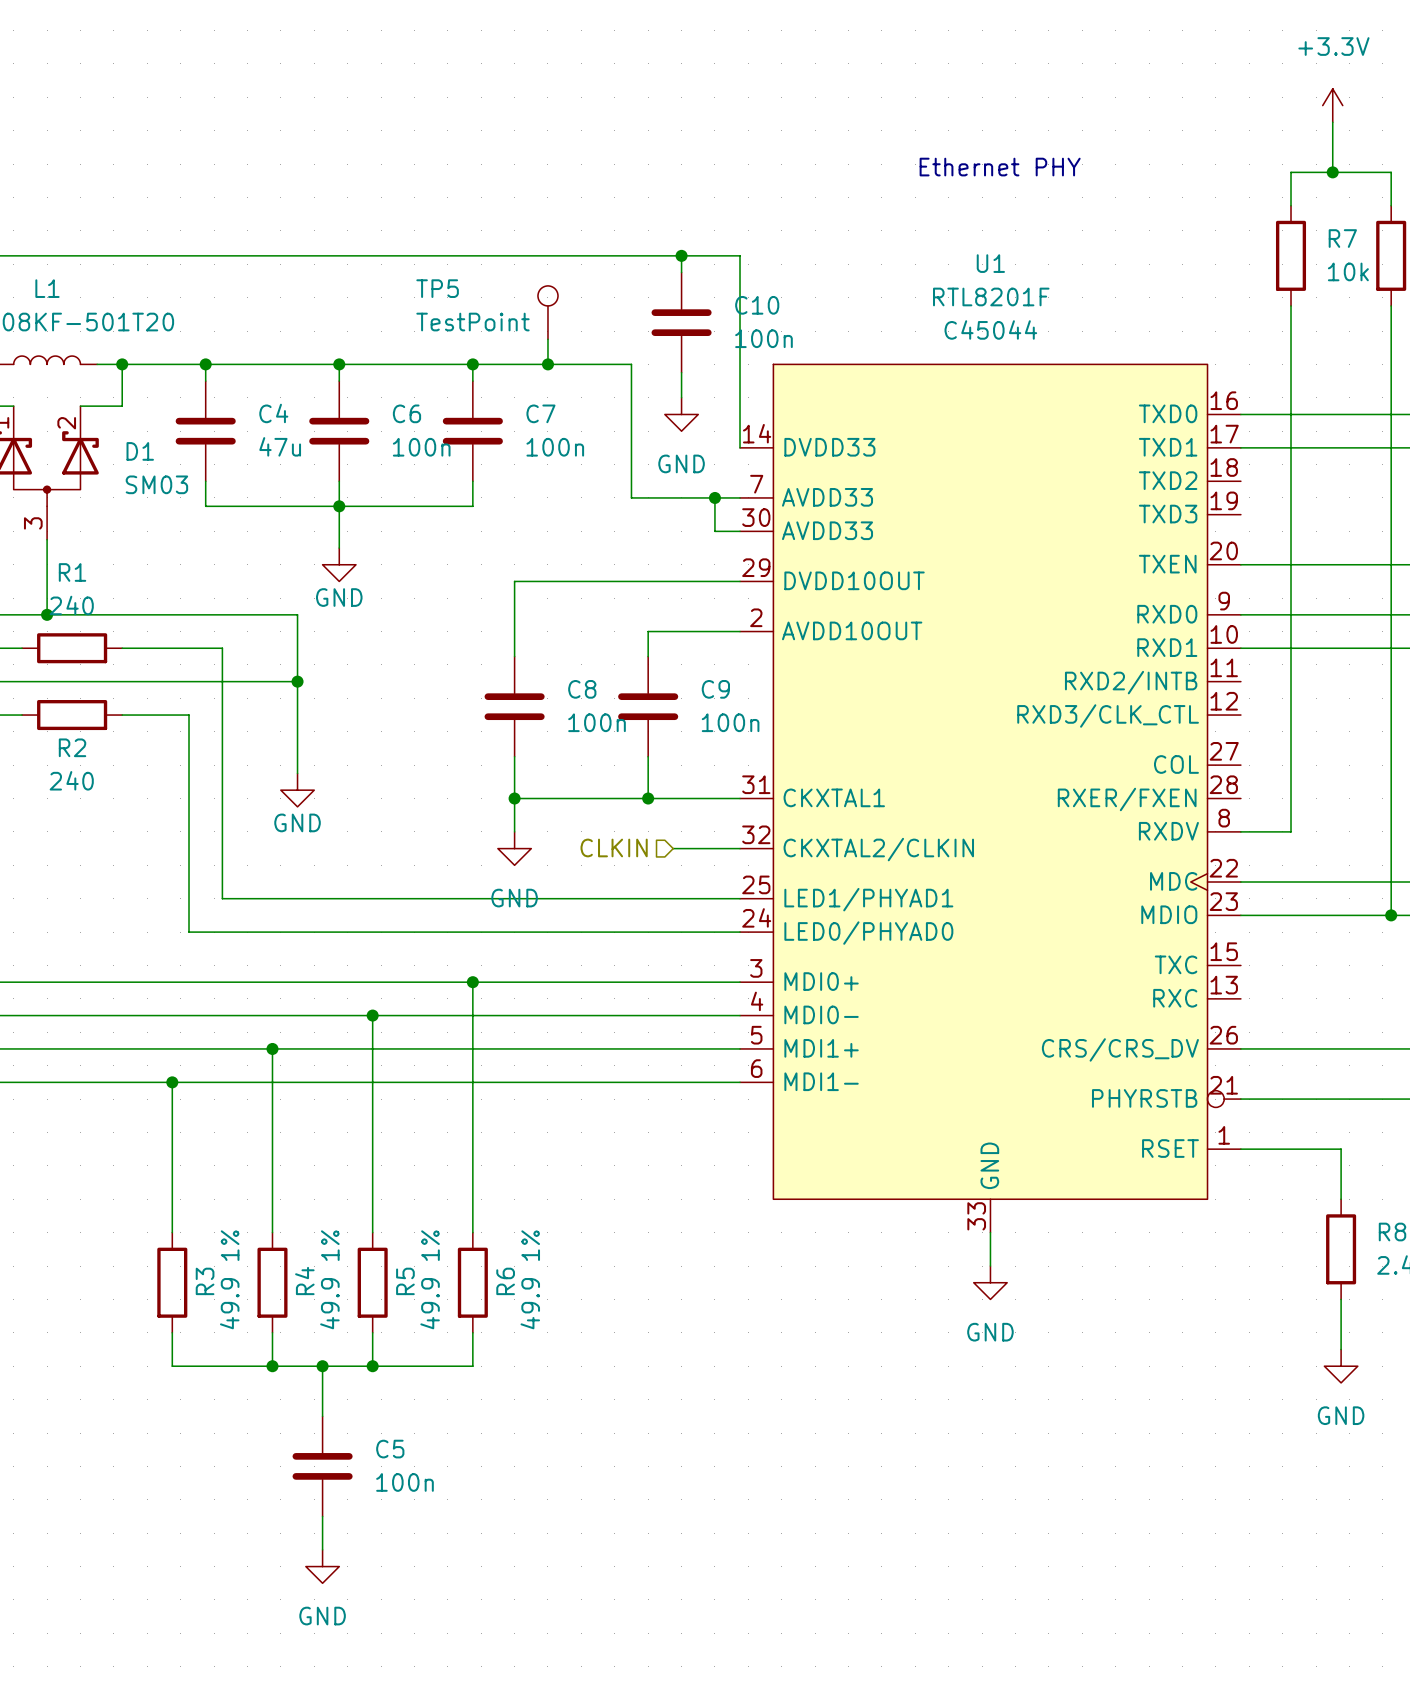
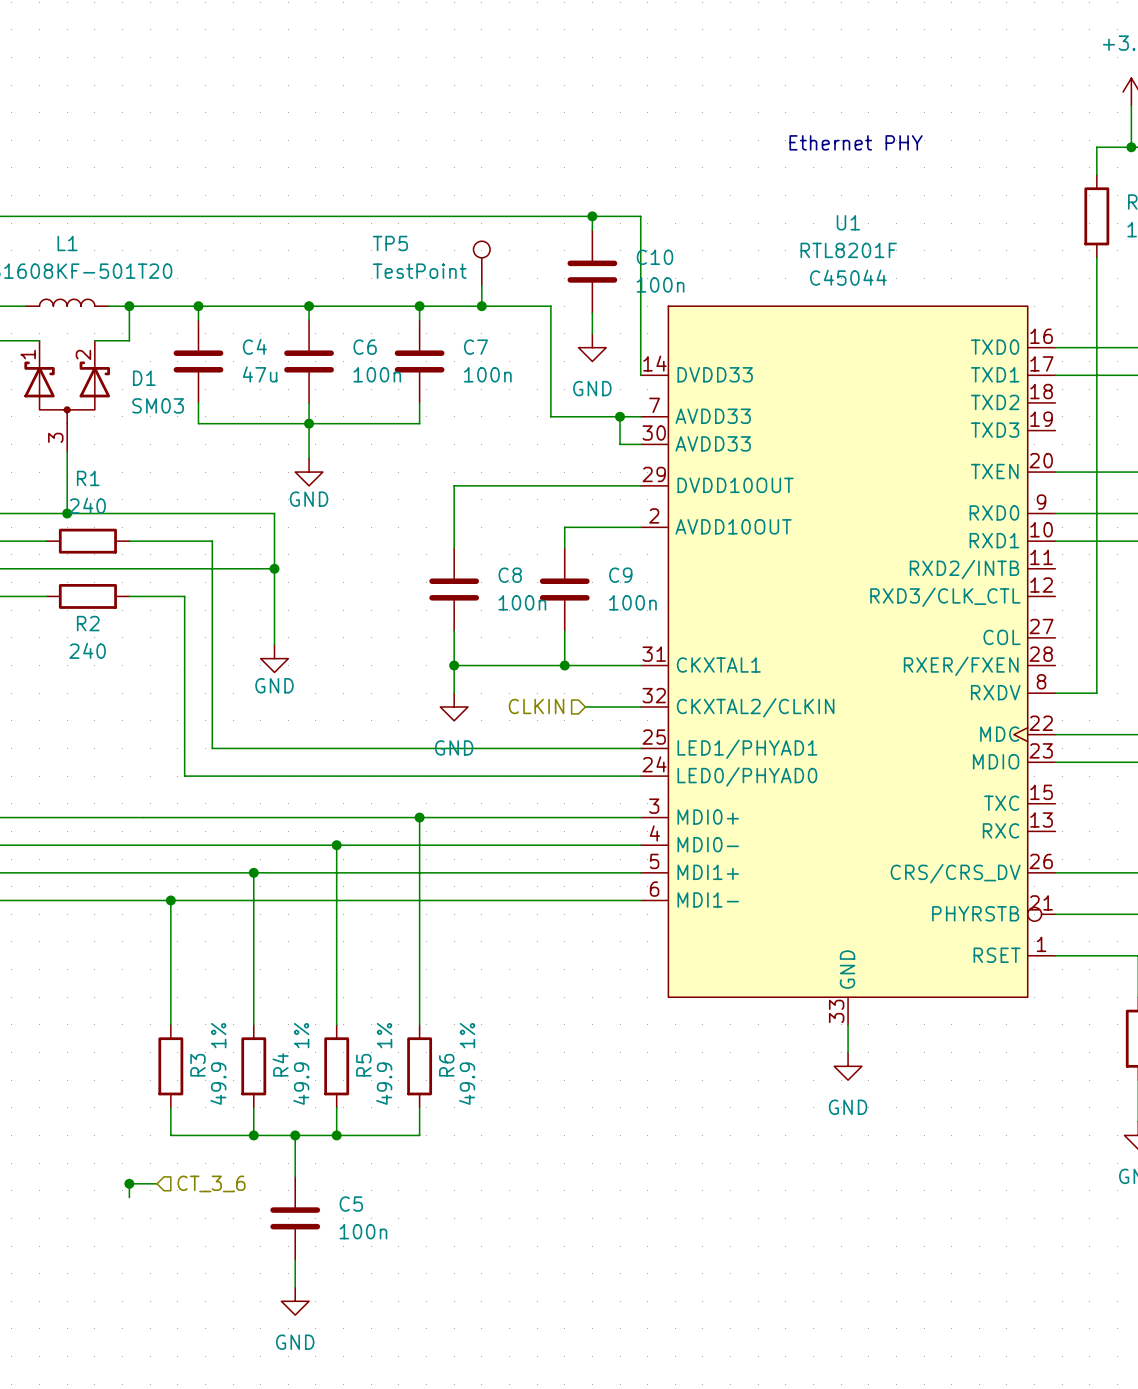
junction: none -> (129, 1183)
wire: none -> (157, 1183) (129, 1183) (129, 1197)
hierarchical label: none -> CT_3_6 (211, 1183)

